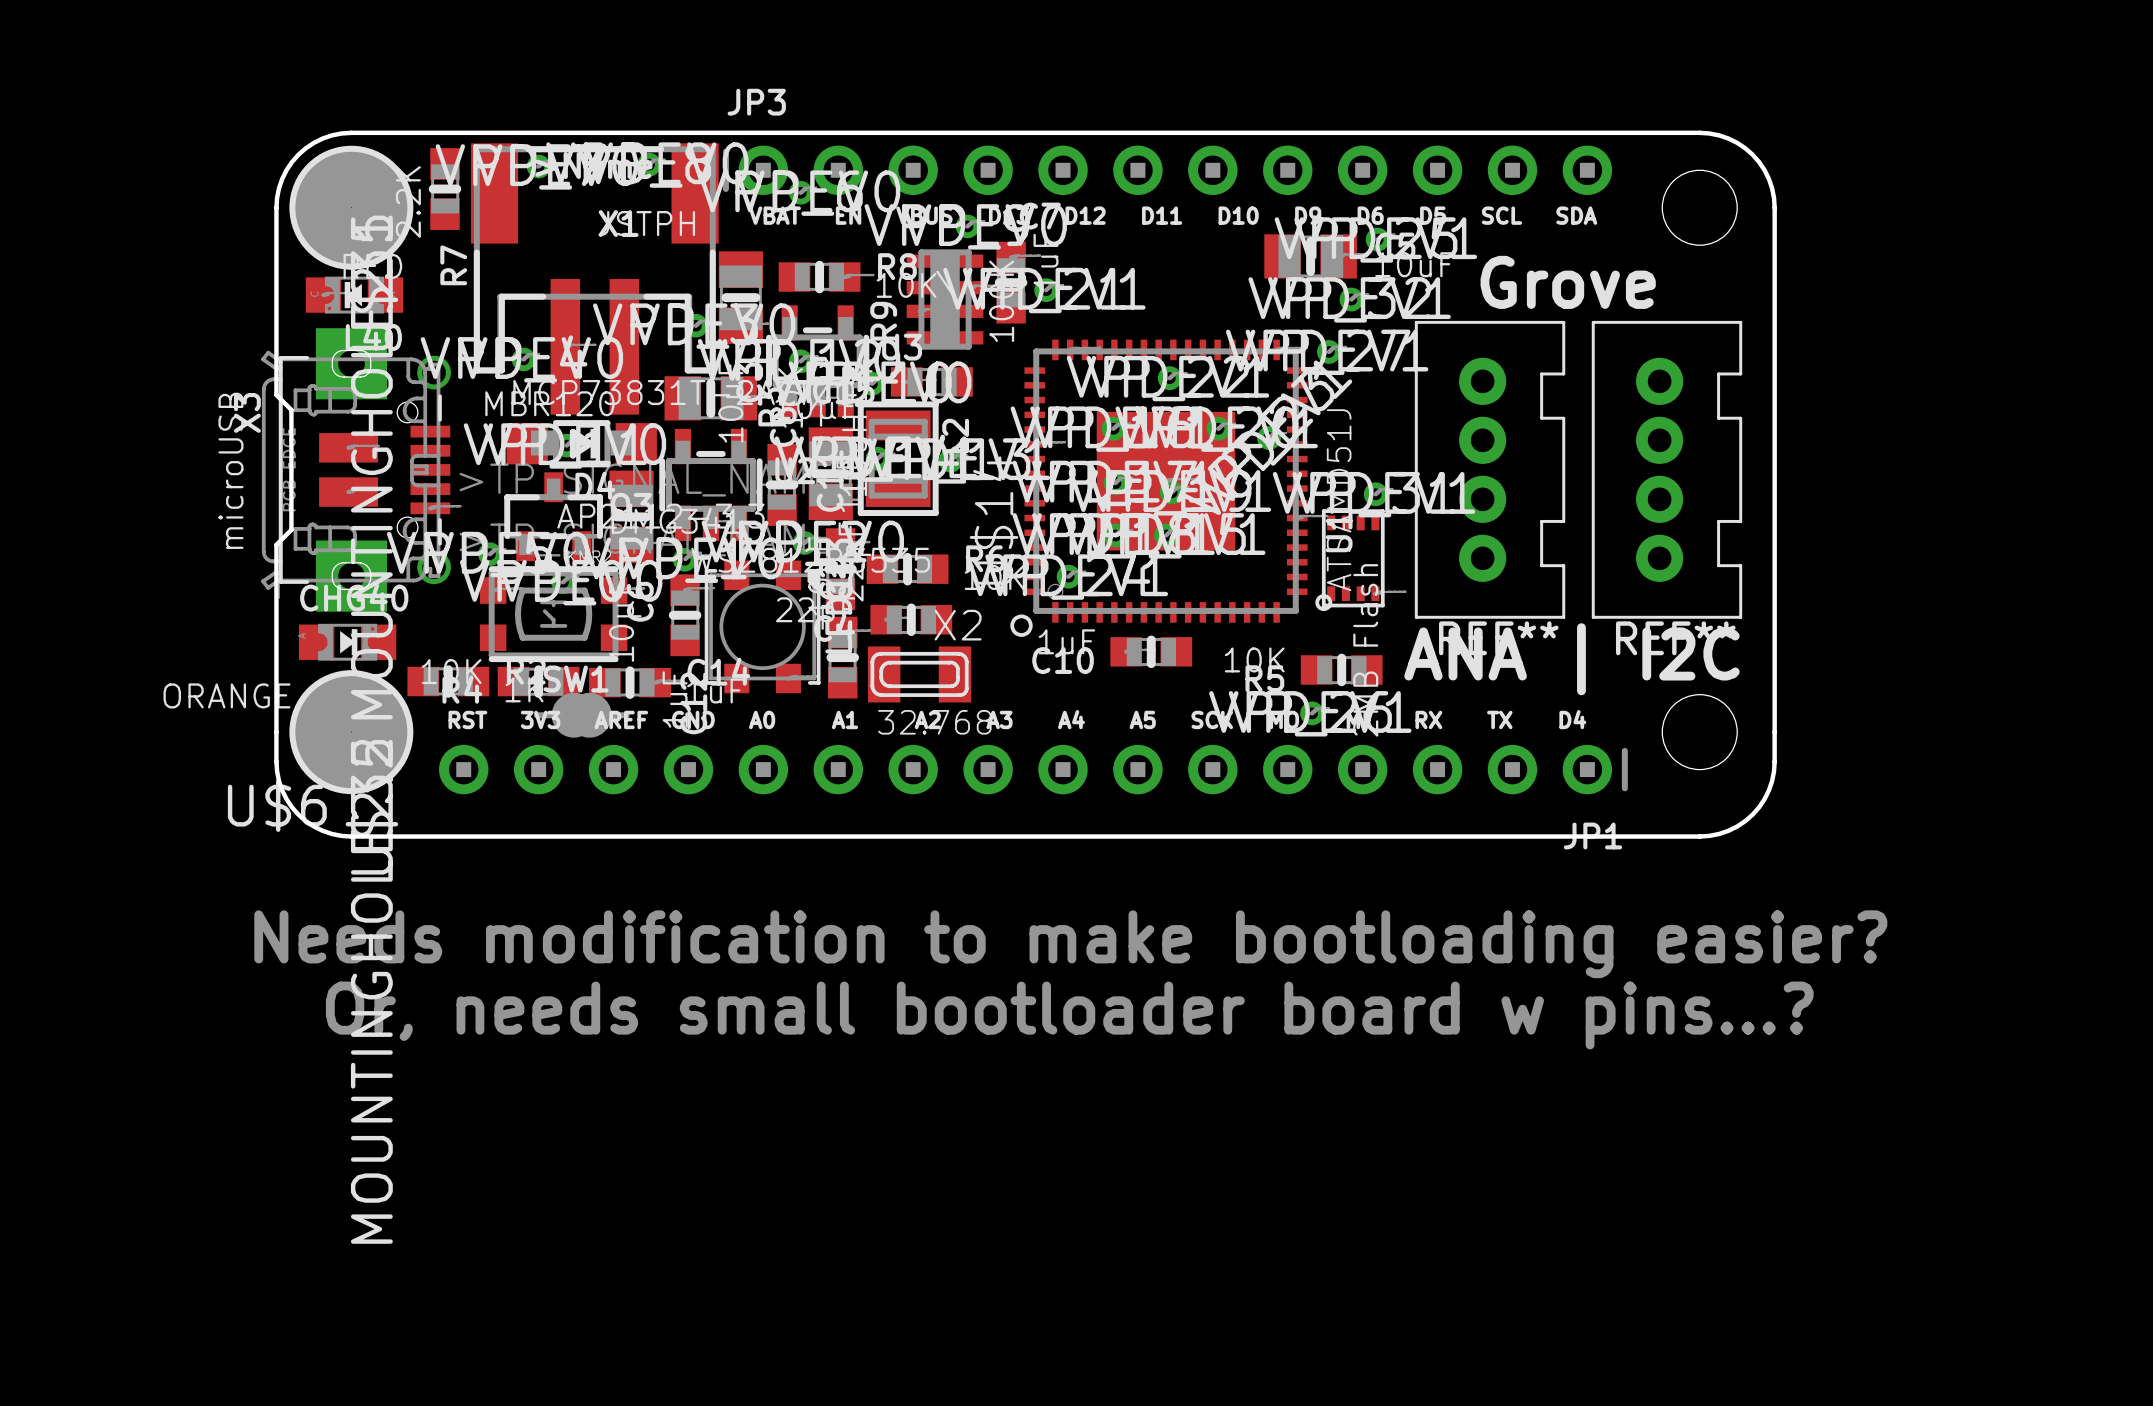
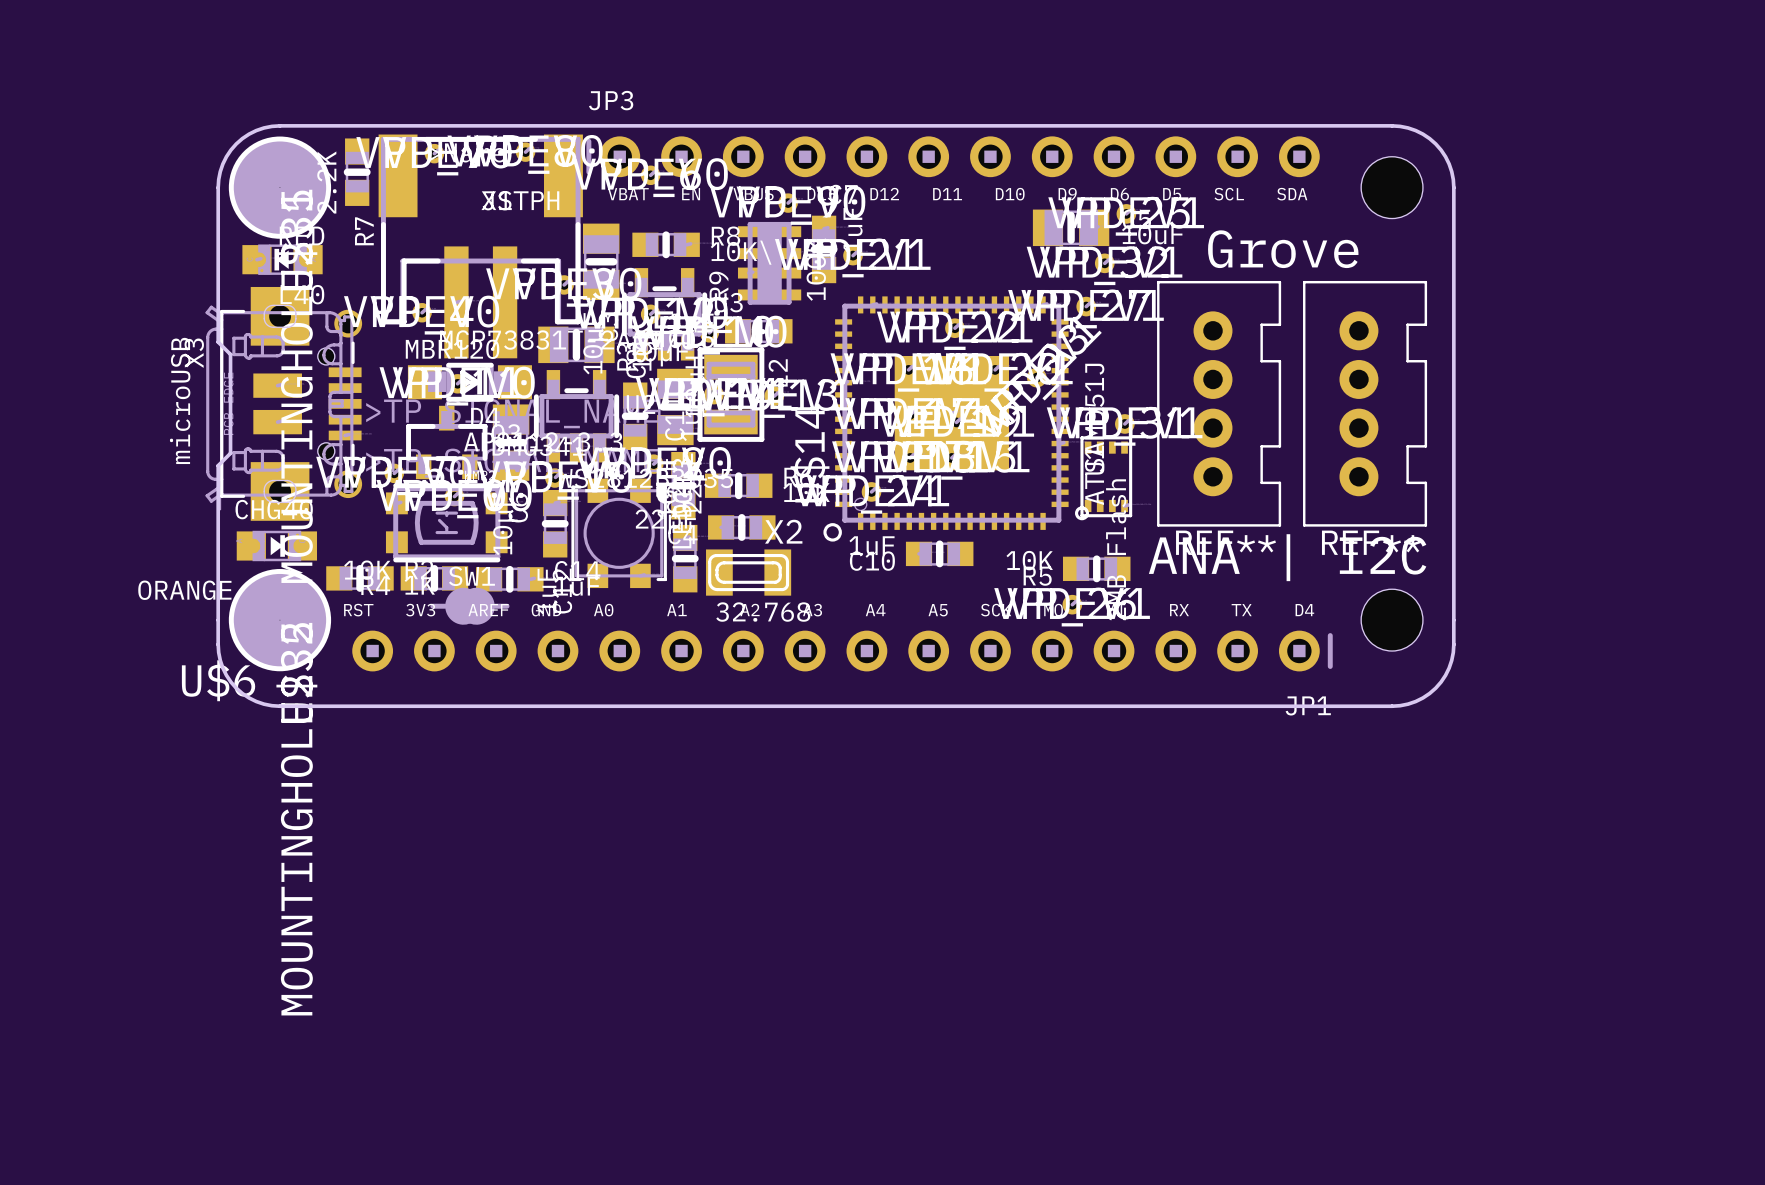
text: Needs modification to make bootloading easier? (1070, 944) -> none
text: Or, needs small bootloader board w pins...? (1069, 1015) -> none

